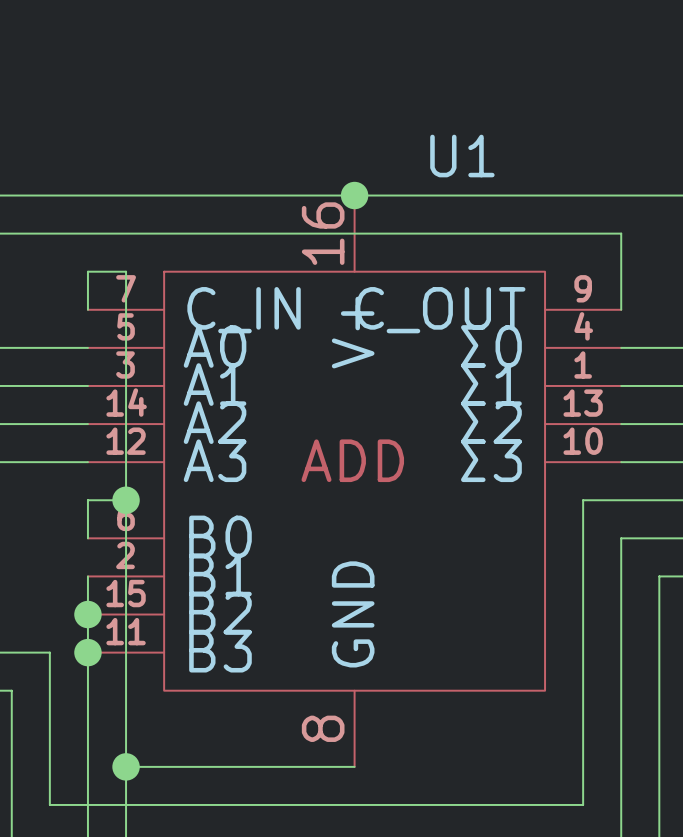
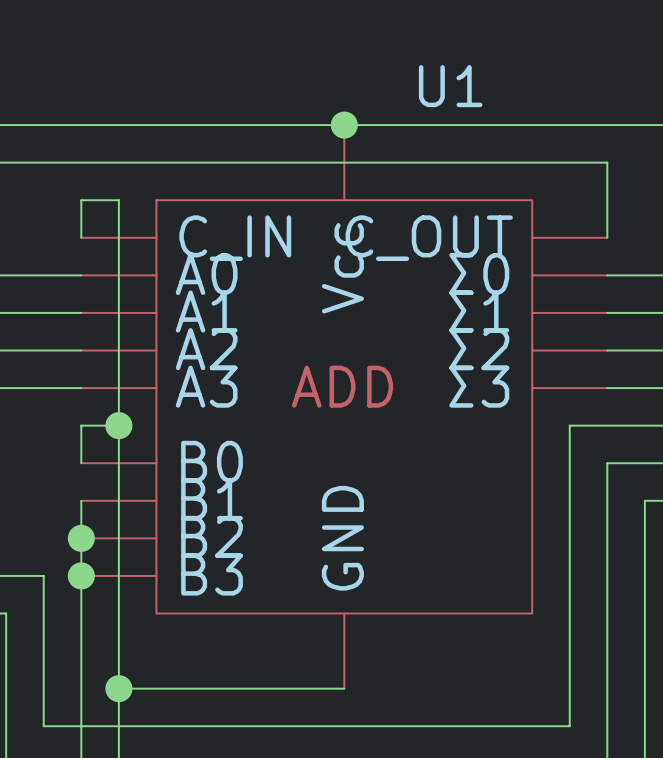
U1 symbol: [87, 195, 622, 767] -> [81, 125, 608, 689]

